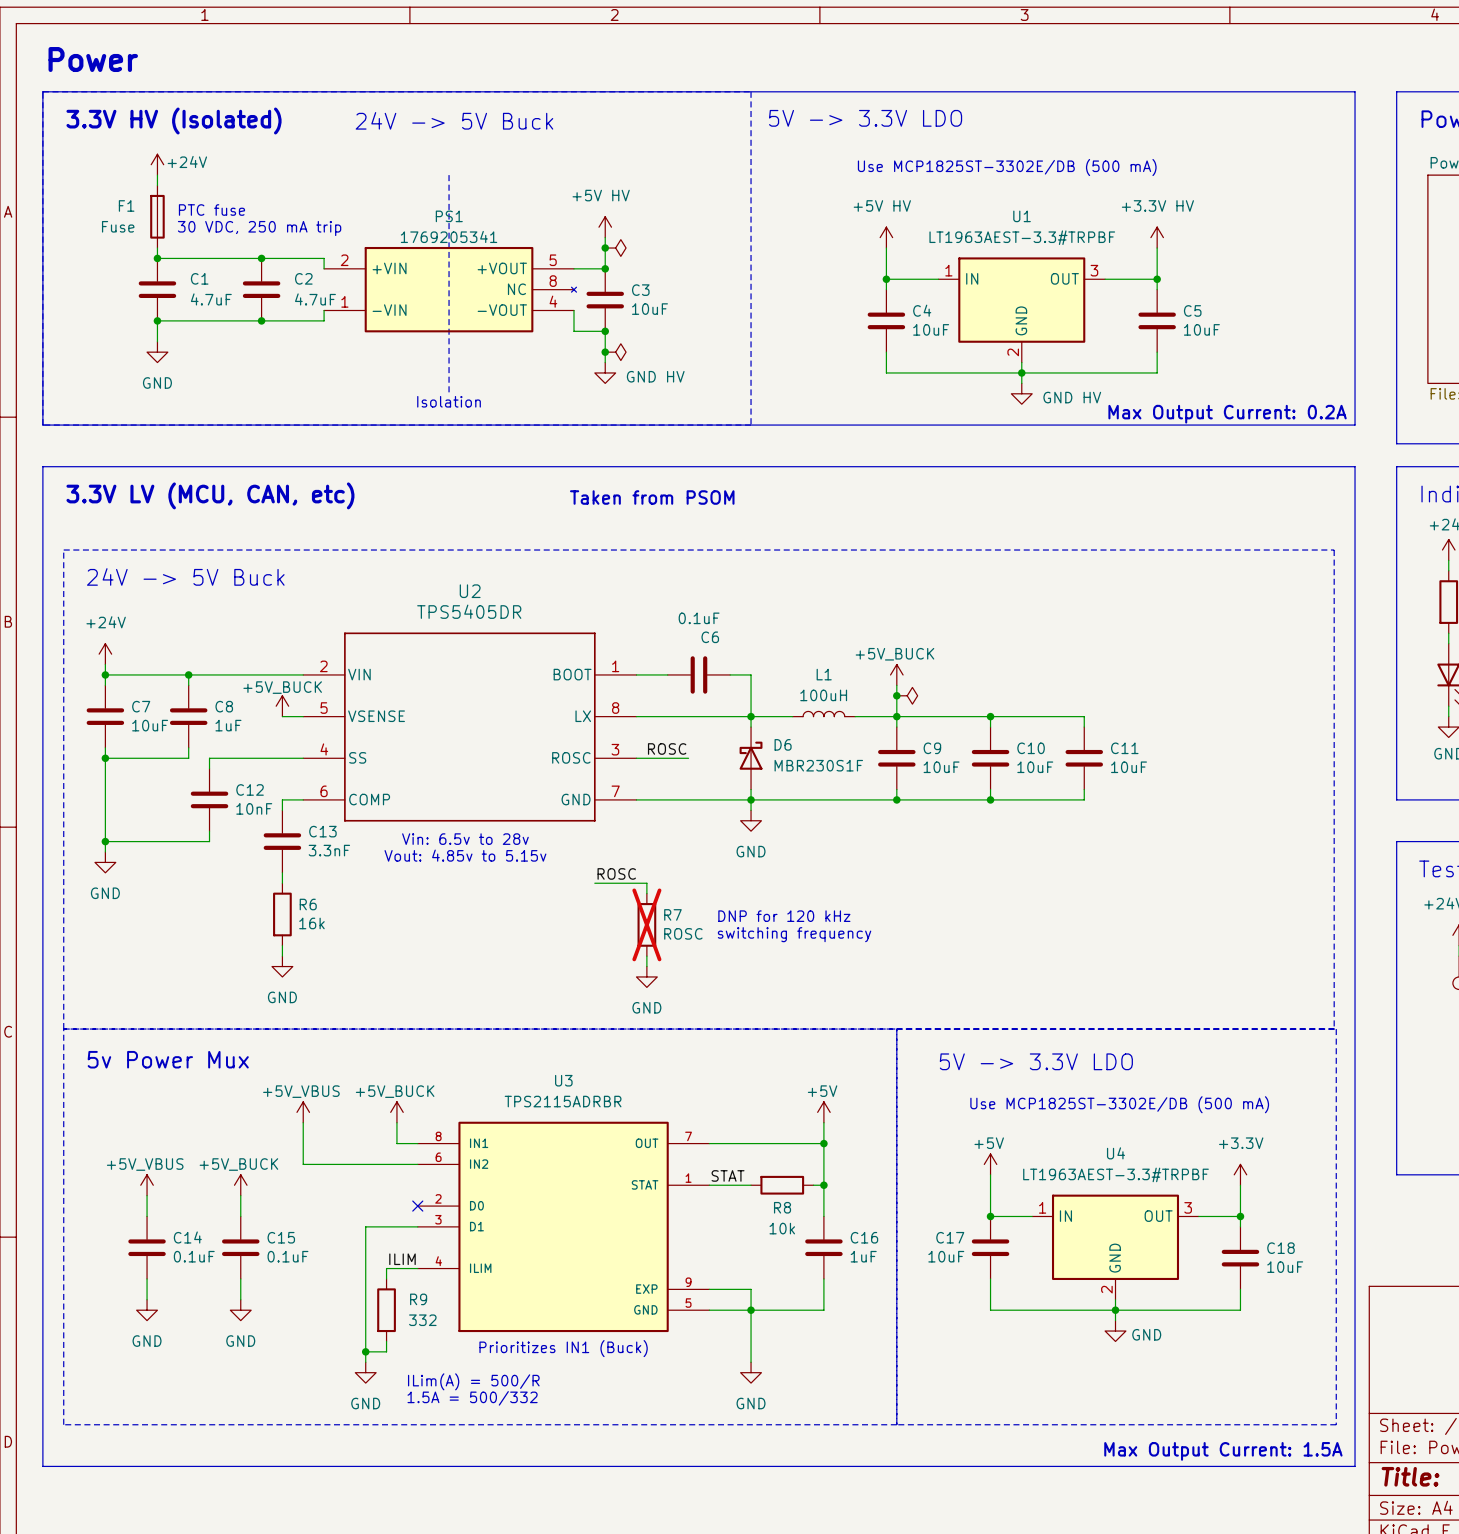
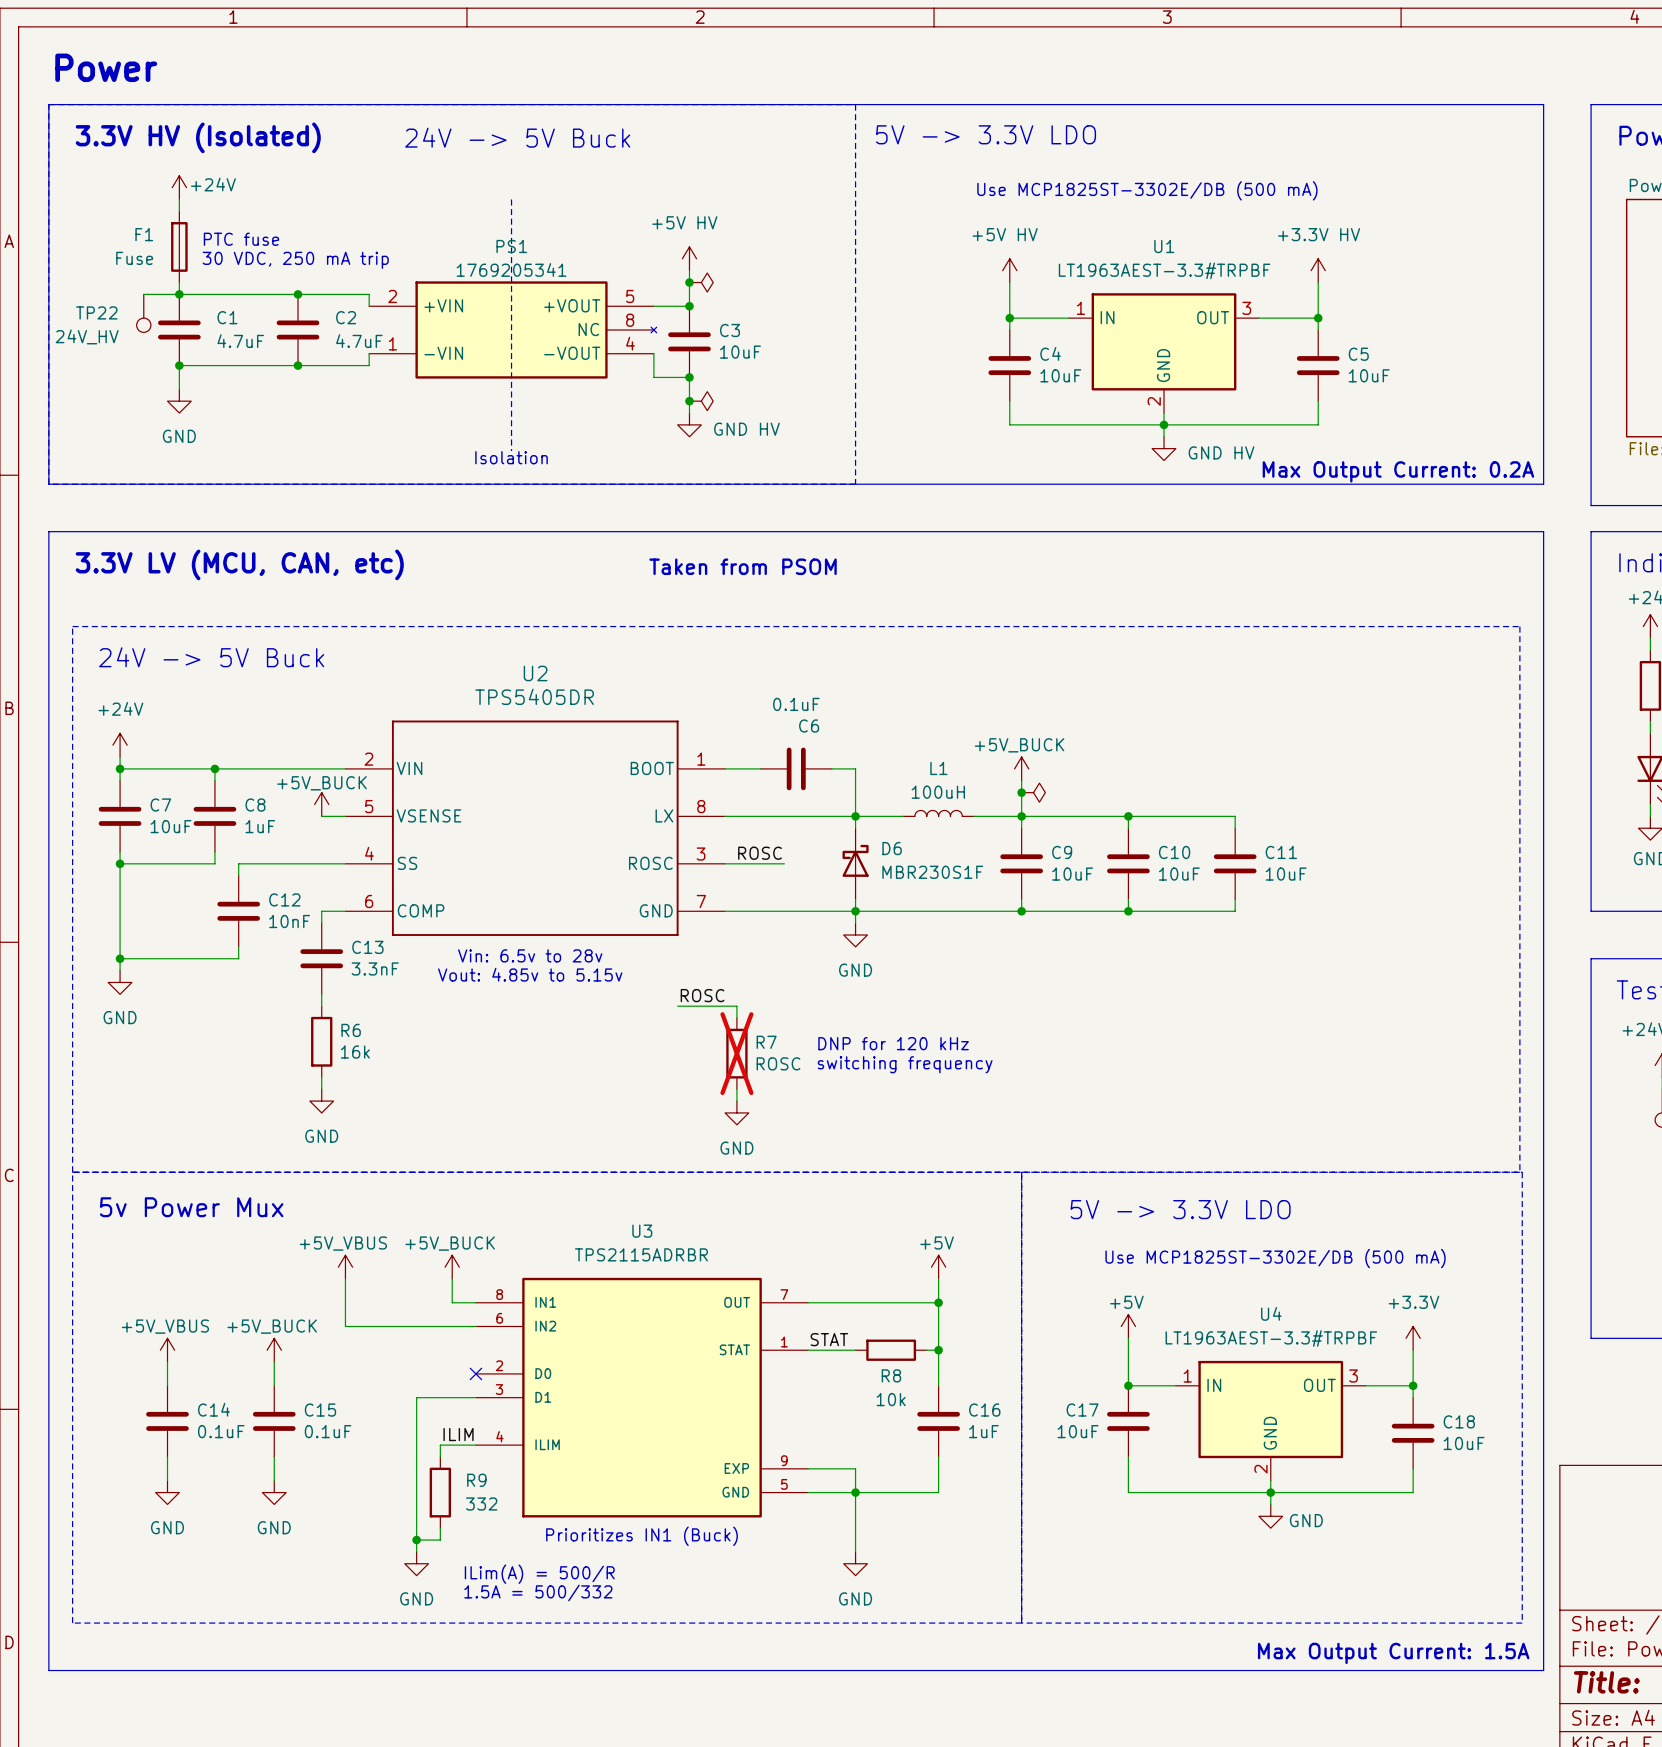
wire: none -> (143, 294) (179, 294)
TP22: none -> 24V_HV (143, 313)

